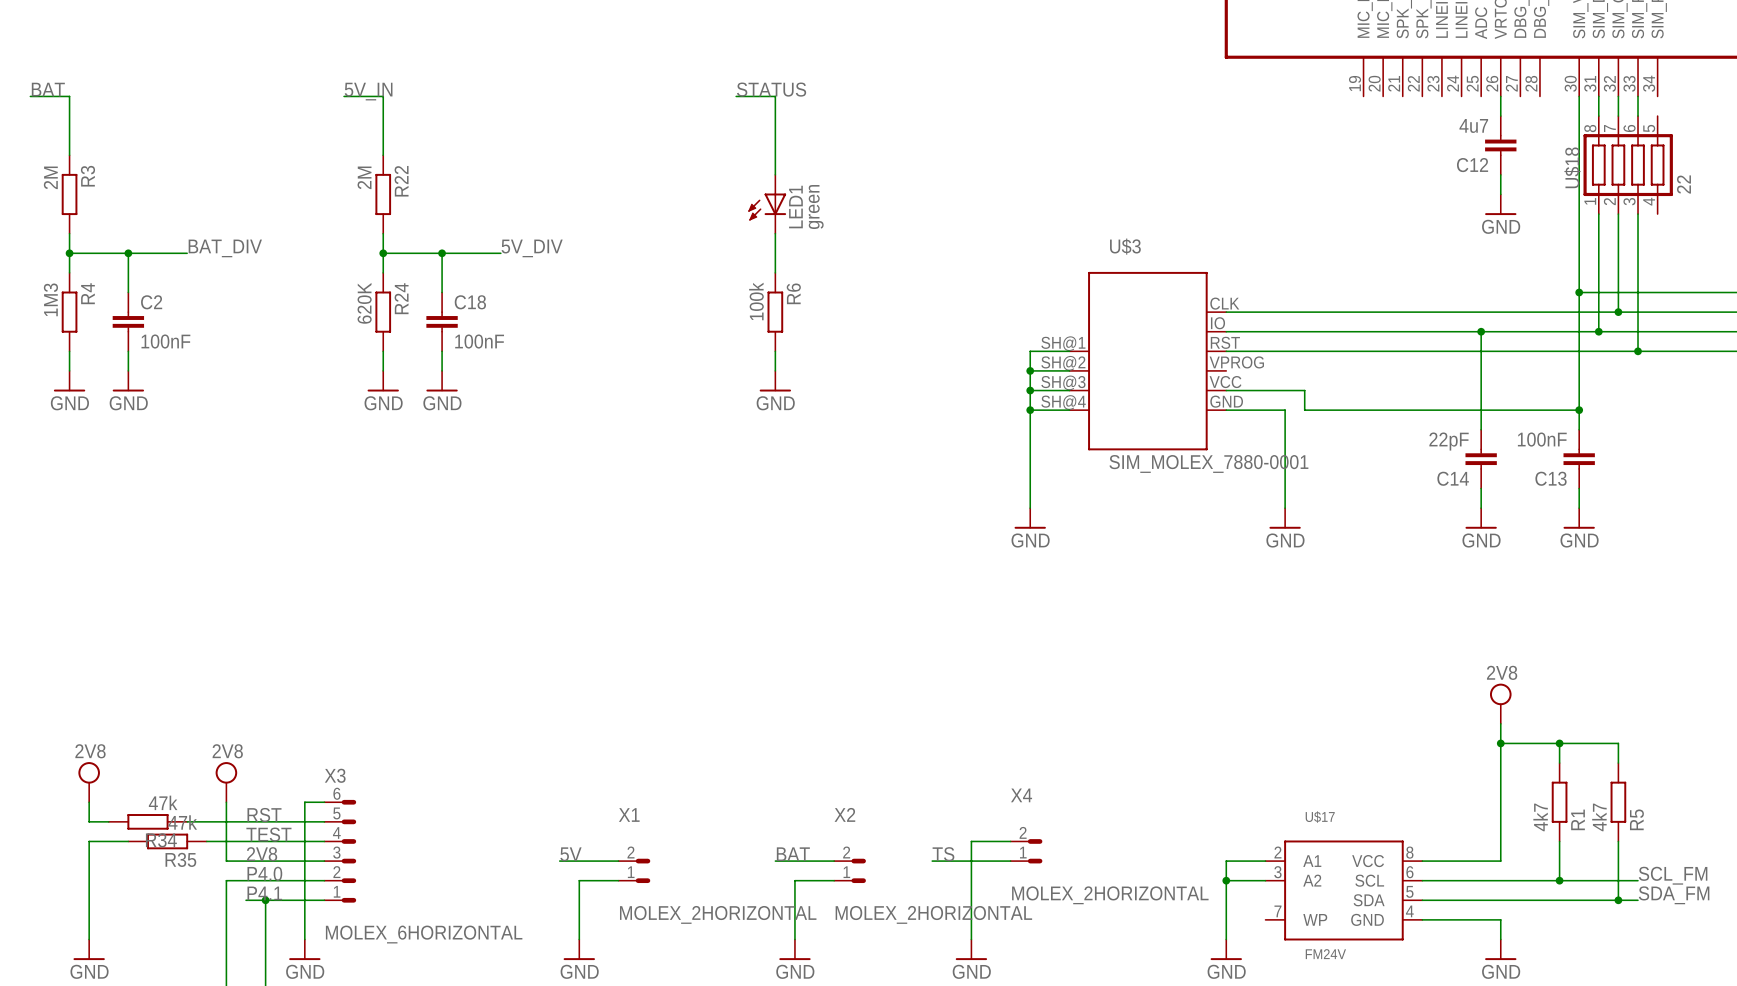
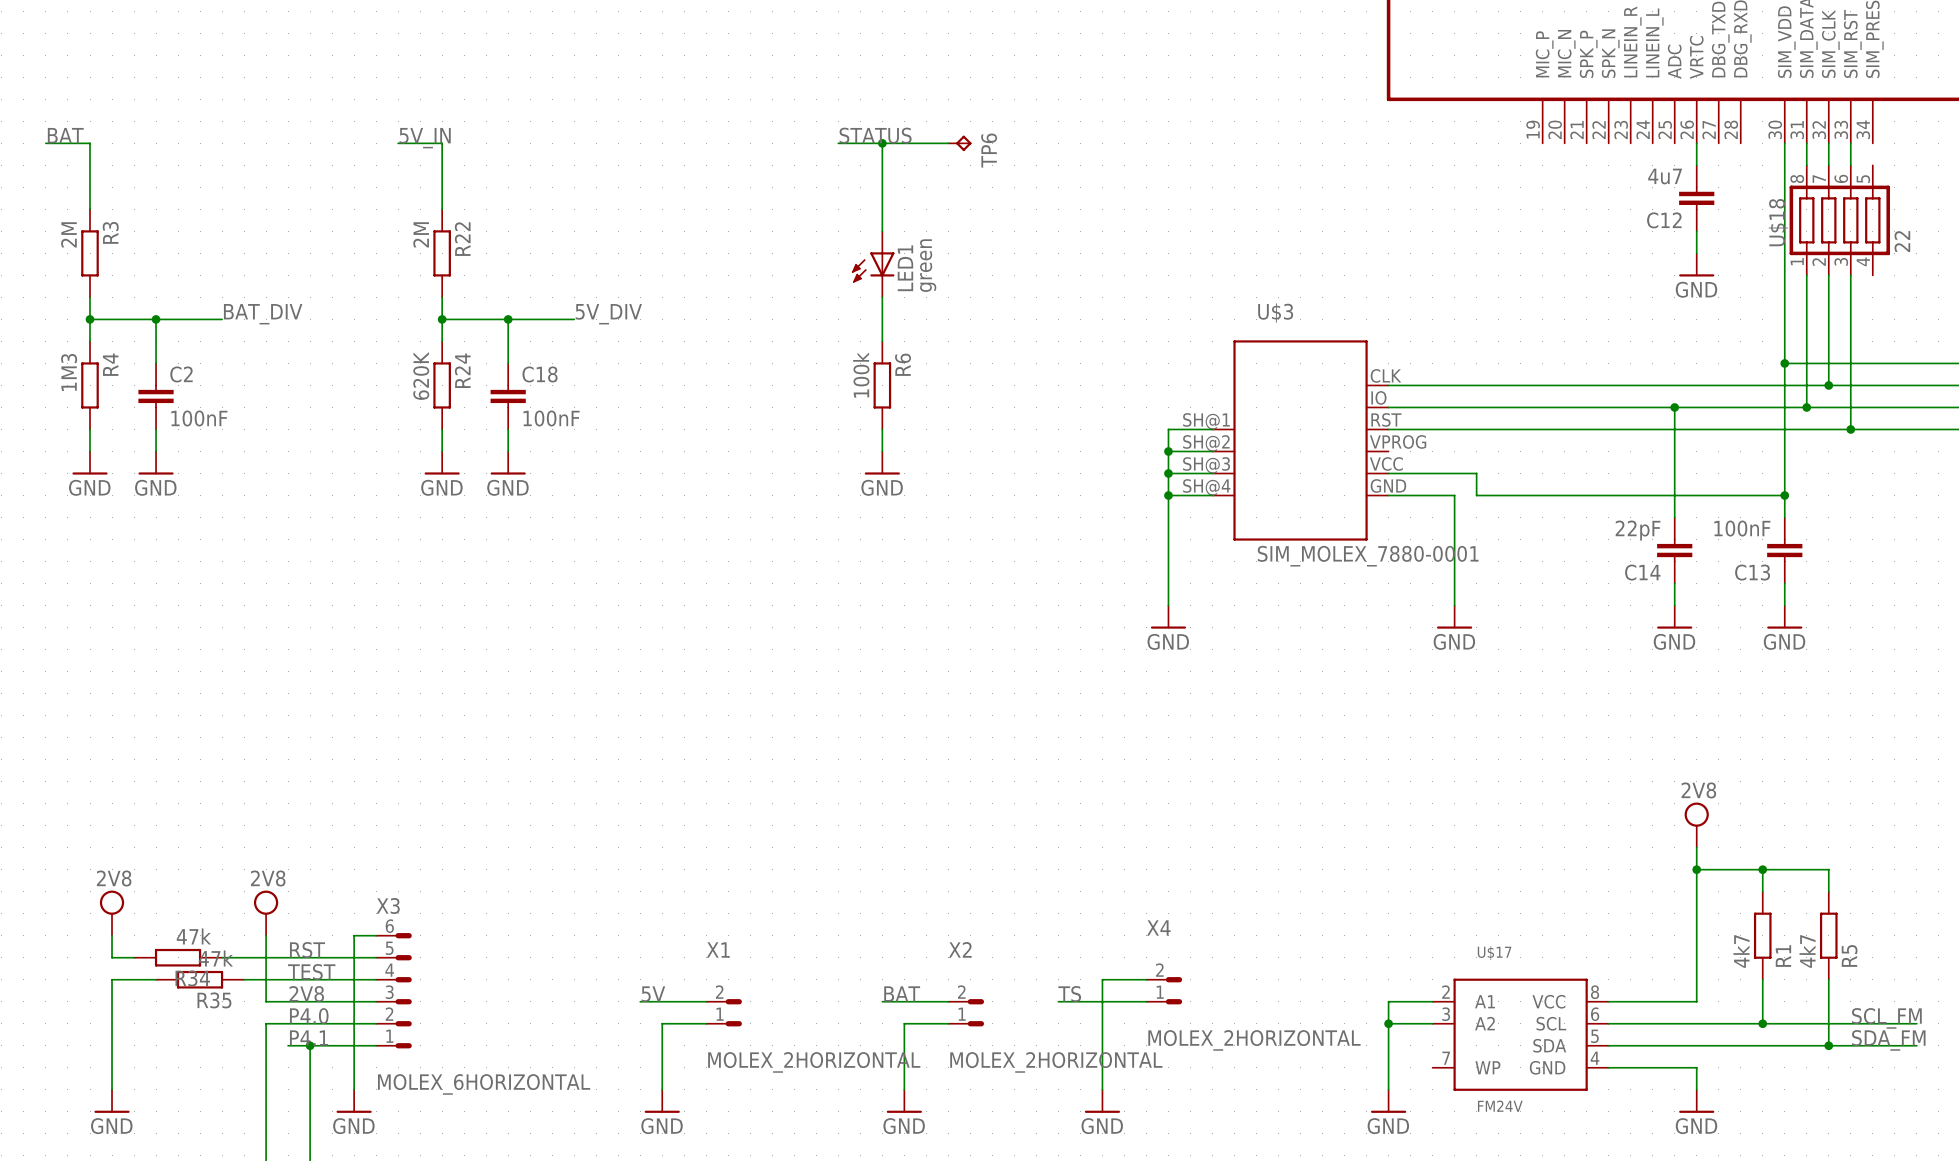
wire: none -> (882, 143) (948, 143)
junction: none -> (882, 143)
TP6: none -> (959, 143)
wire: none -> (1850, 1023) (1916, 1023)
wire: none -> (1850, 1045) (1916, 1045)

